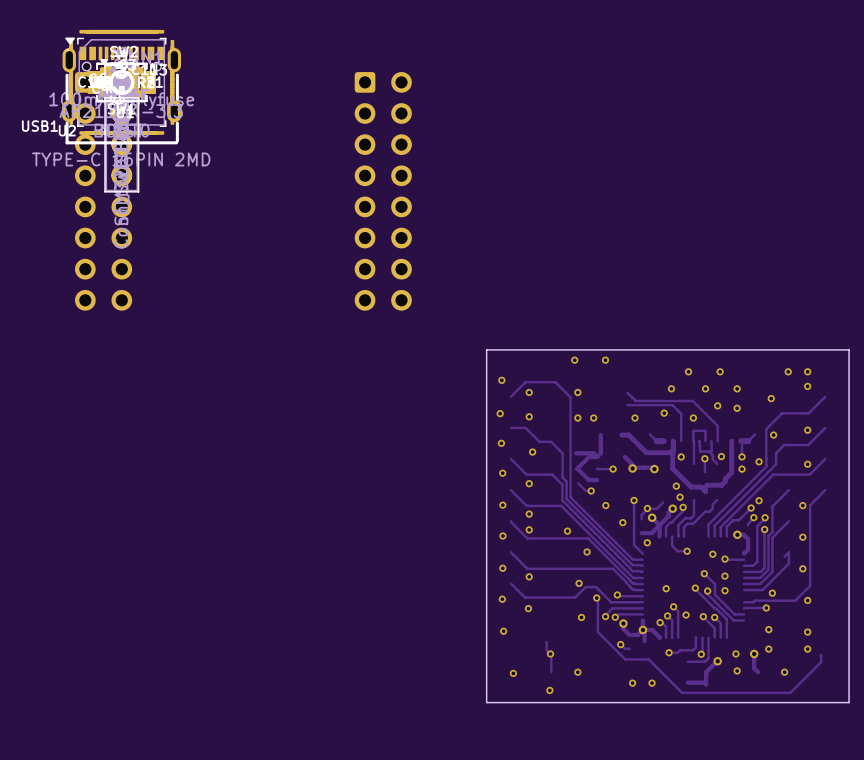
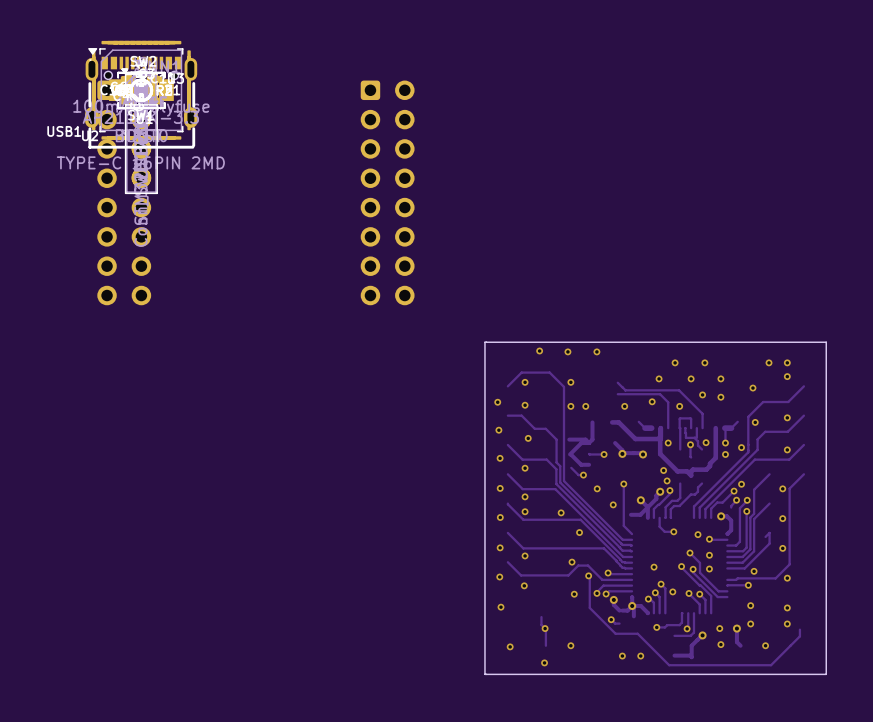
via position: (501, 380) -> (539, 350)
track: (662, 502) (656, 508) (647, 508) -> none
track: (647, 508) (641, 514) (641, 519) -> none
via: (647, 508) -> none
via: (647, 542) -> none

